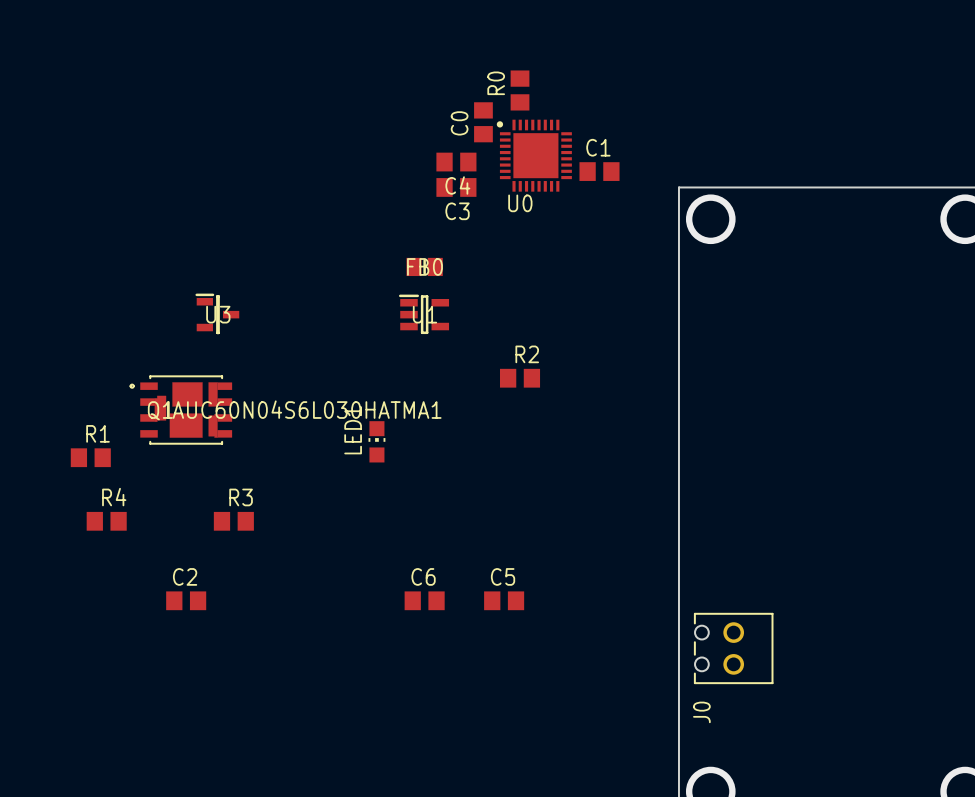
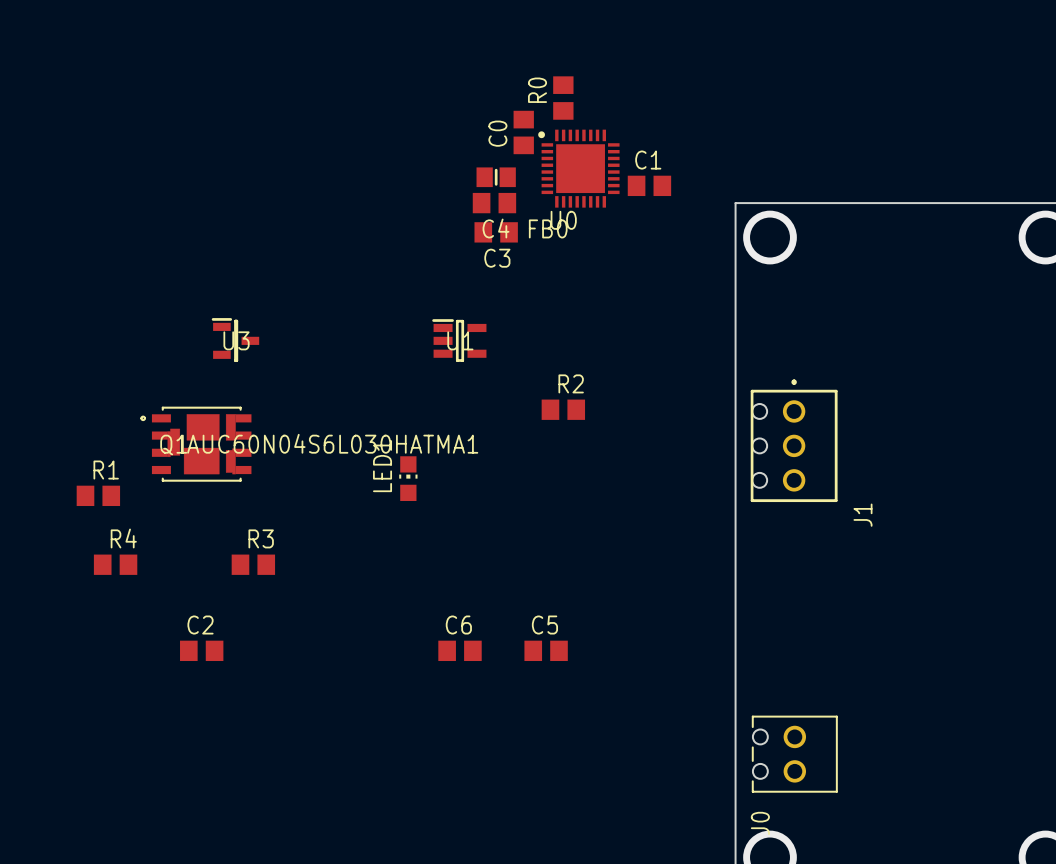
C4: (456, 162) -> none
C3 name: C3 (457, 211) -> C4 (496, 228)
C3: none -> (496, 232)
FB0 position: (424, 266) -> (496, 177)
FB0 name position: FB0 (424, 266) -> FB0 (548, 228)
J1: none -> (794, 440)
J0 position: (733, 648) -> (794, 754)

